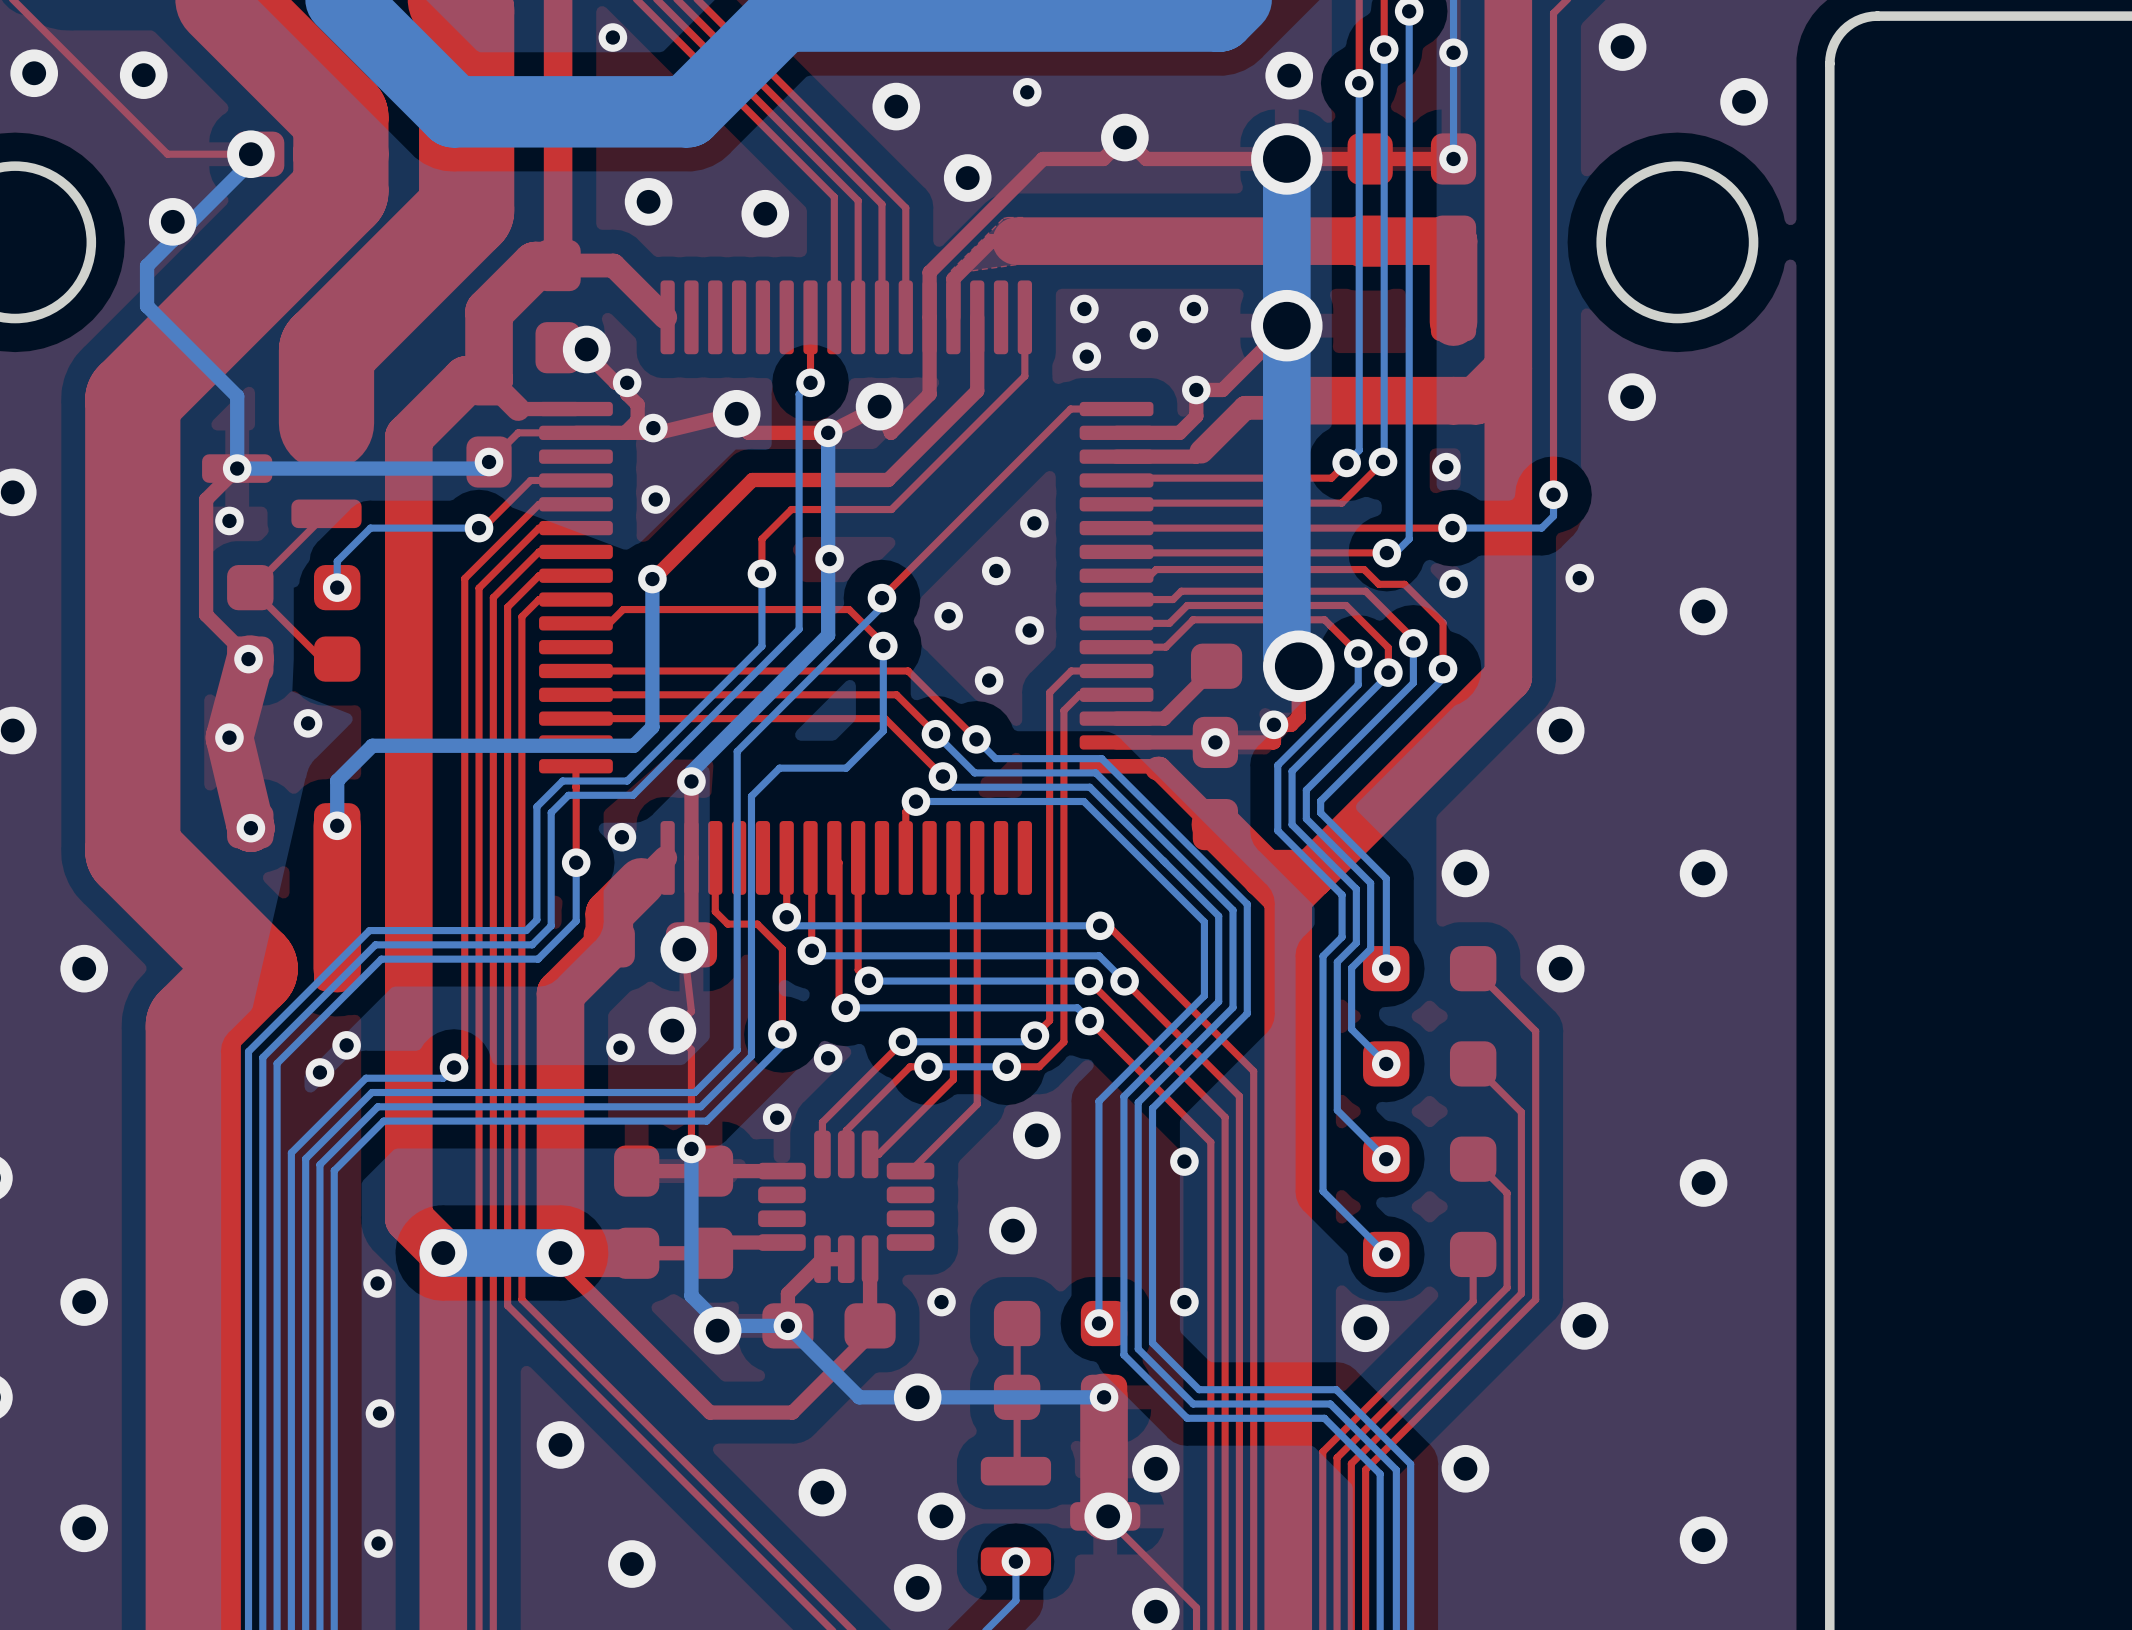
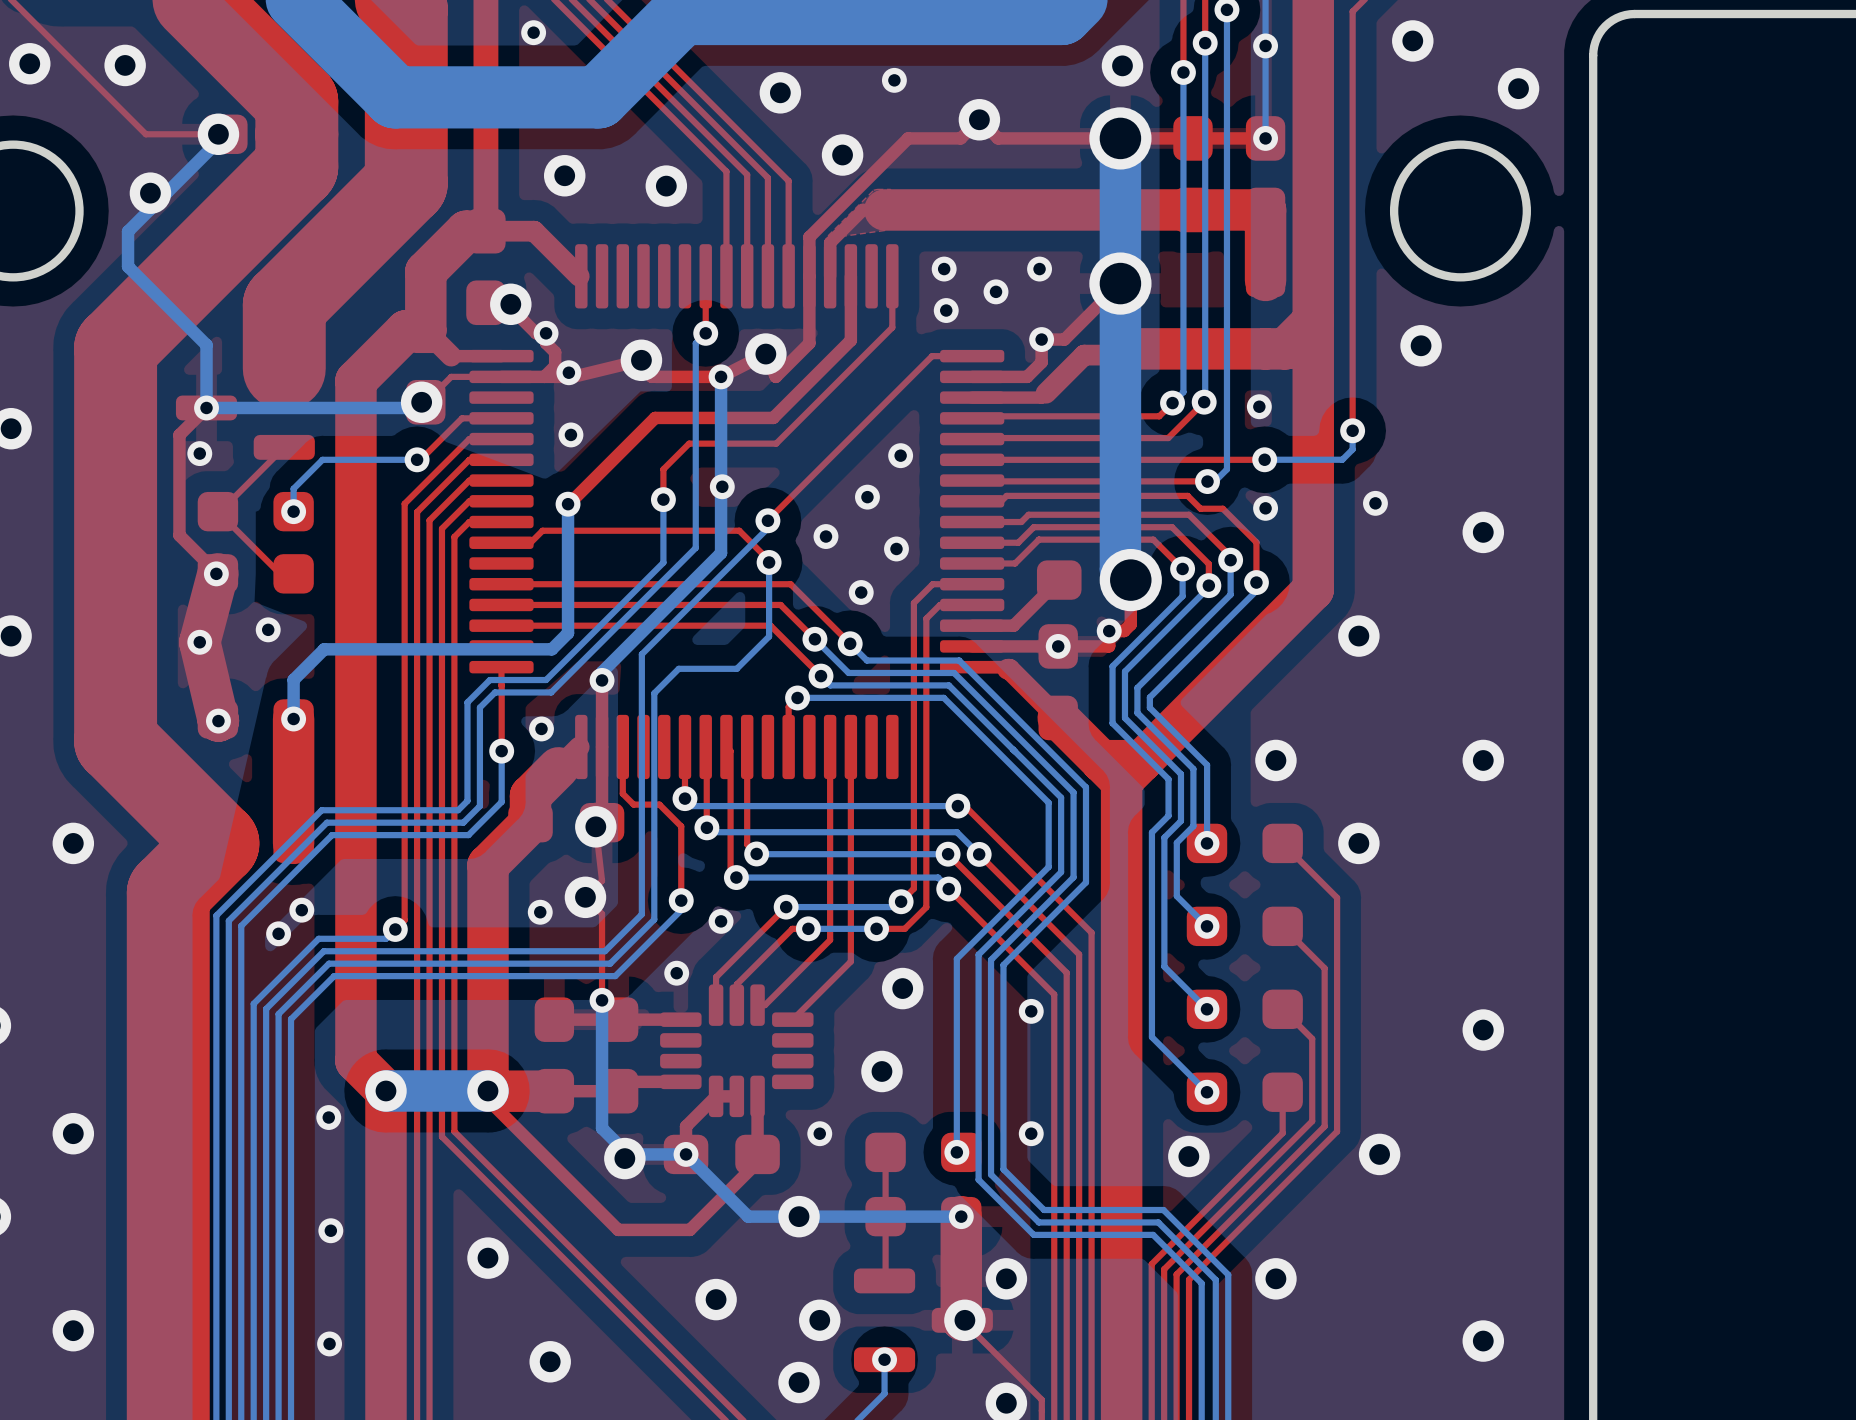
via size: [474, 447, 504, 477] -> [400, 381, 443, 424]

